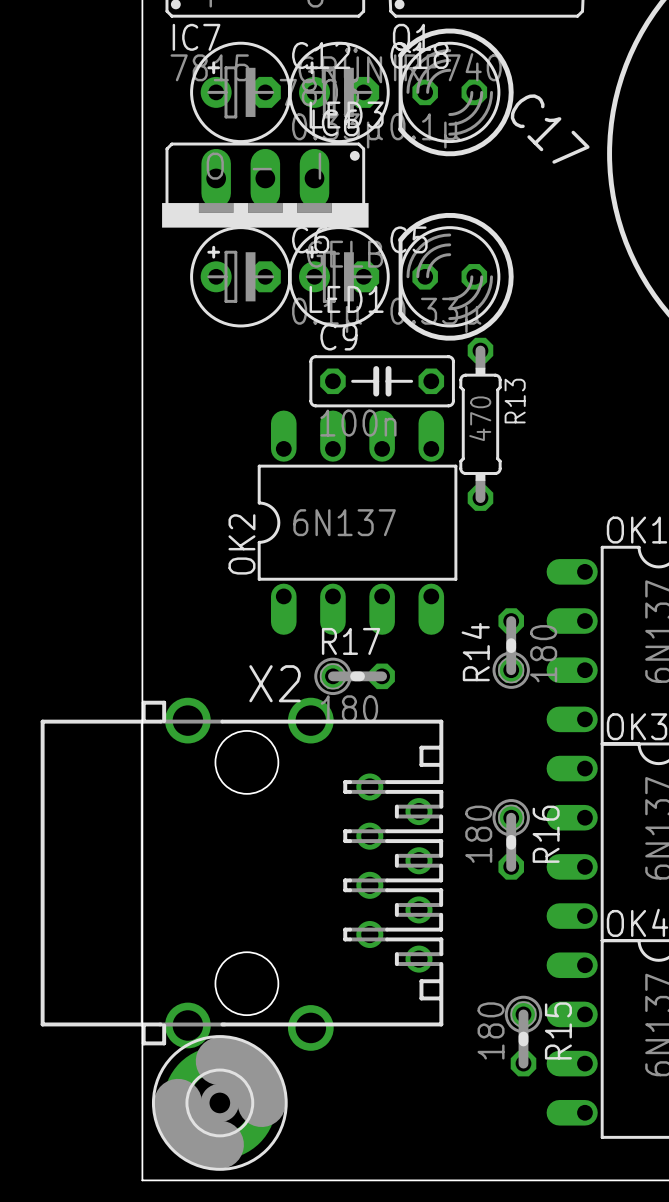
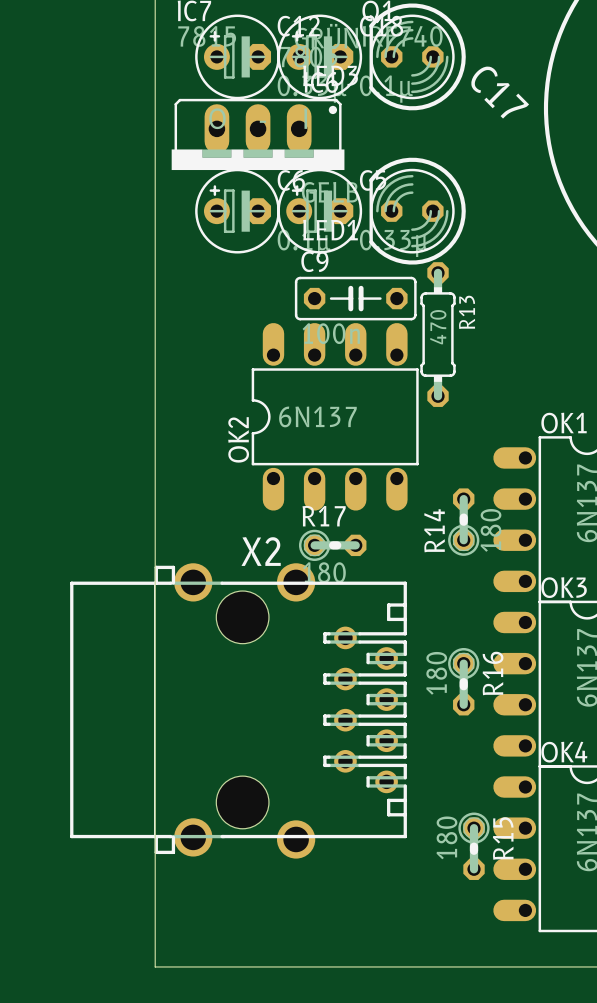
part: (219, 1102) -> none

